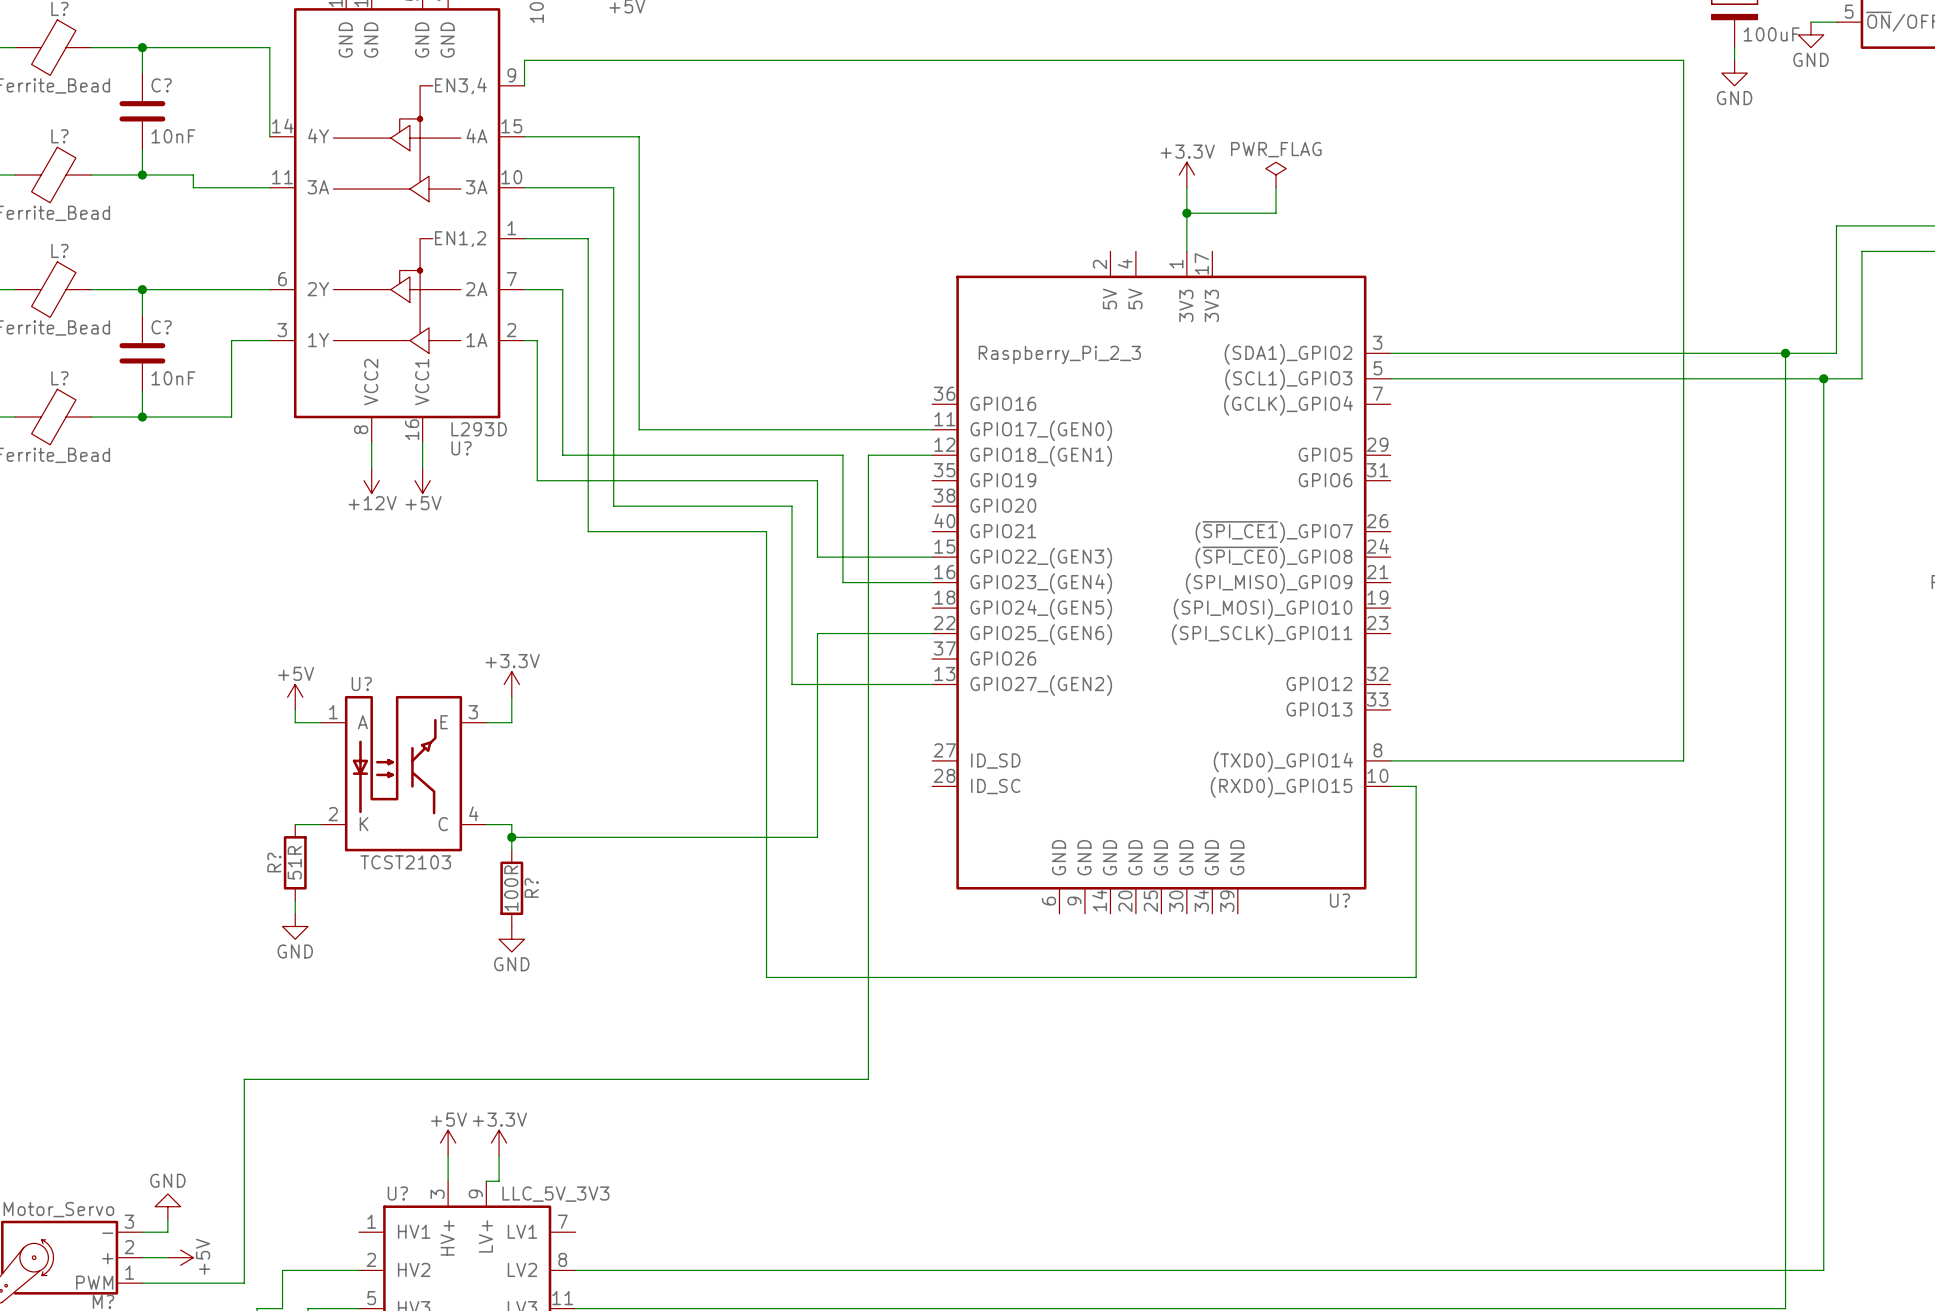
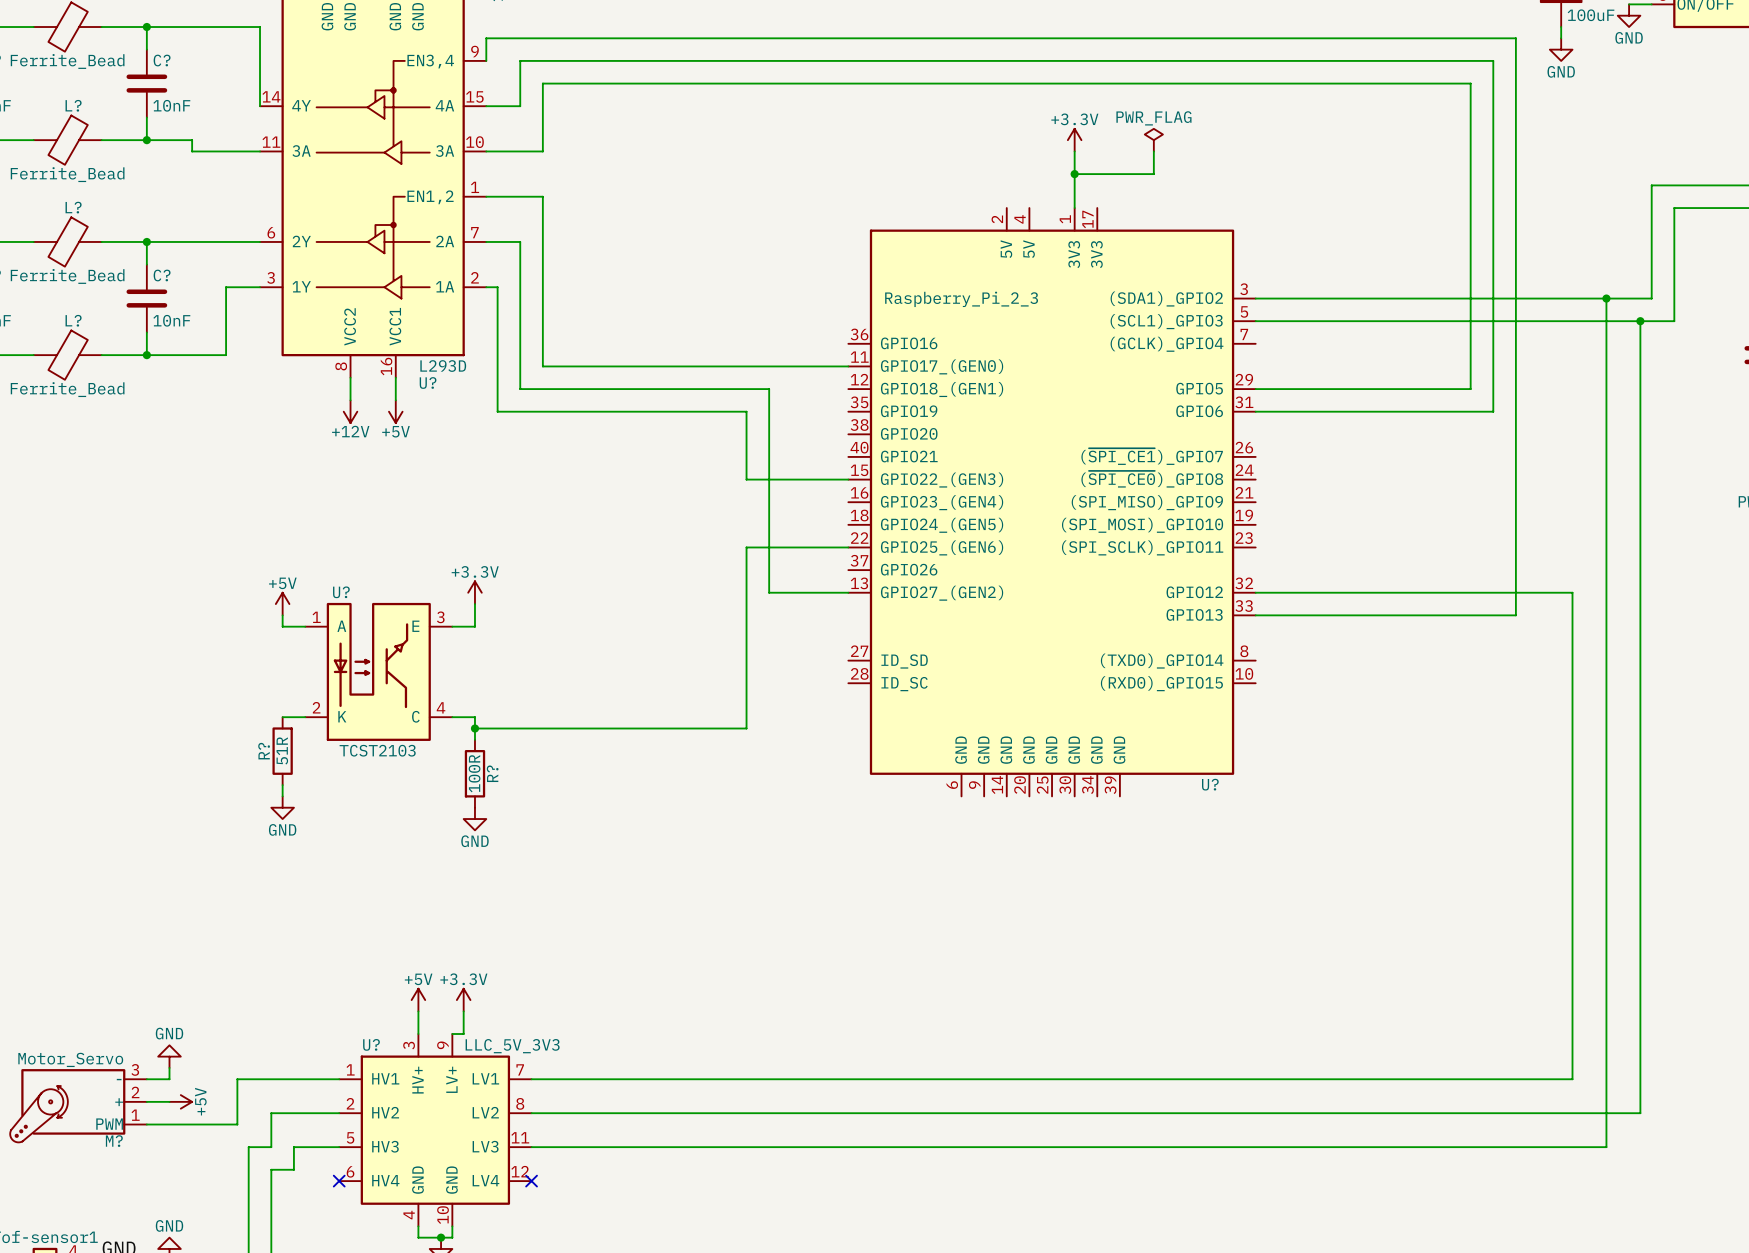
wire: (562, 136) (639, 136) (639, 429) -> (542, 366) (588, 366)
wire: none -> (520, 106) (520, 60) (1493, 60) (1493, 411) (1255, 411)
wire: (588, 187) (613, 187) (613, 506) (792, 506) (792, 684) (842, 684) -> (542, 151) (542, 83) (1470, 83) (1470, 389) (1255, 389)
wire: (588, 429) (588, 531) (766, 531) (766, 977) (1416, 977) (1416, 786) (1390, 786) -> none
wire: (932, 455) (868, 455) (868, 1079) (244, 1079) (244, 1232) -> (339, 1079) (237, 1079)
wire: (842, 582) (932, 582) -> (769, 502) (769, 592)
wire: none -> (1255, 592) (1572, 592) (1572, 1079) (531, 1079)
wire: (1683, 709) (1683, 760) (1390, 760) -> (1515, 615) (1255, 615)

